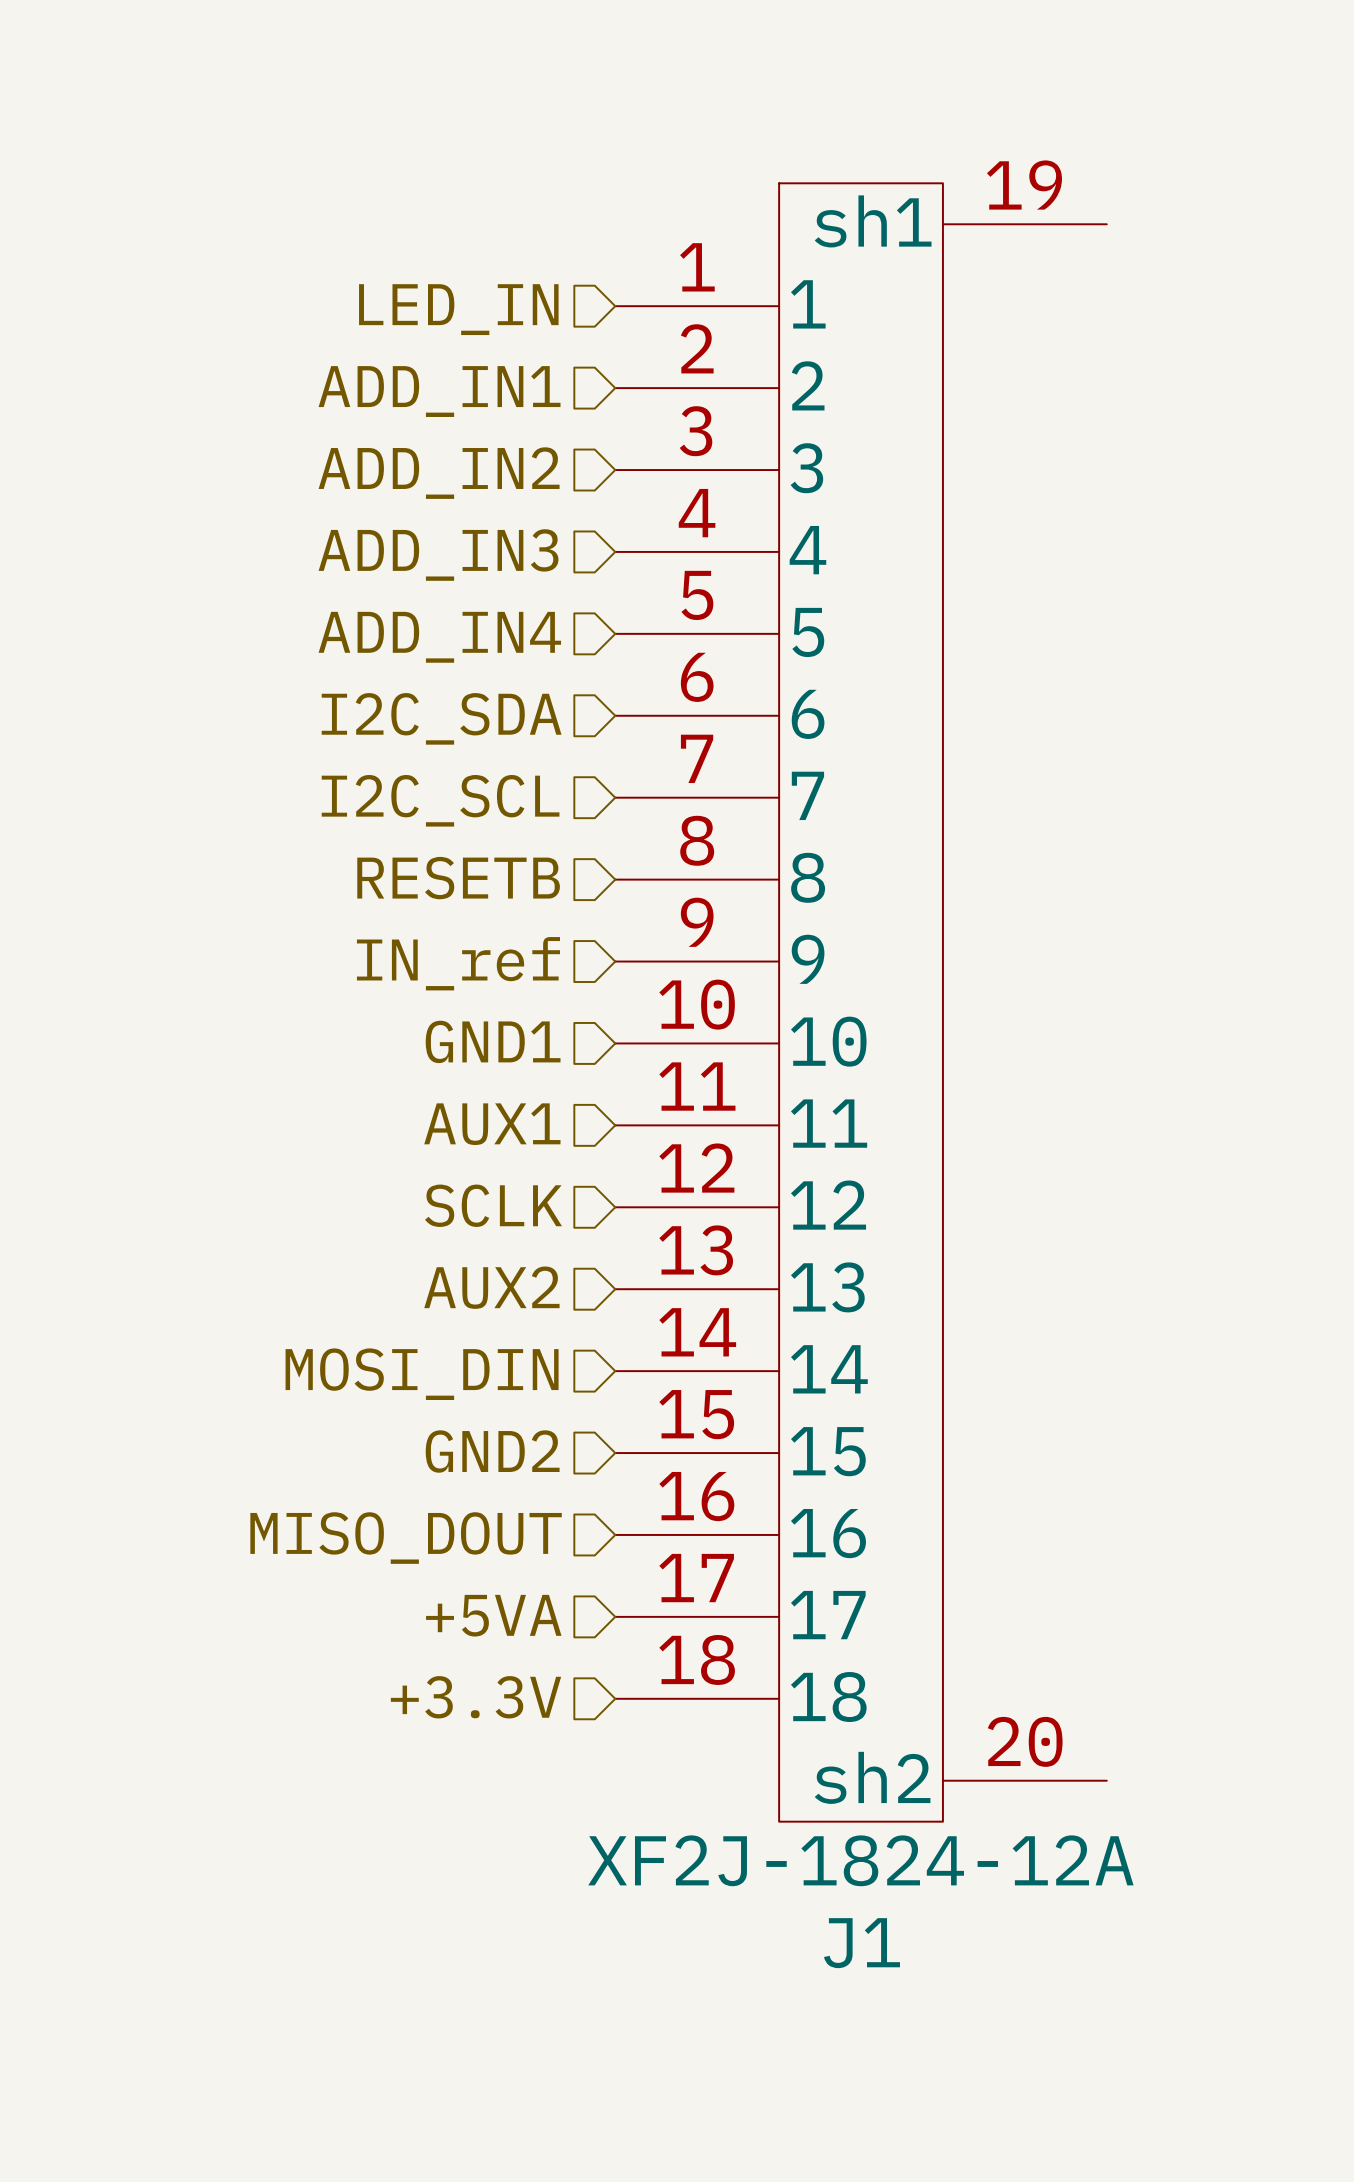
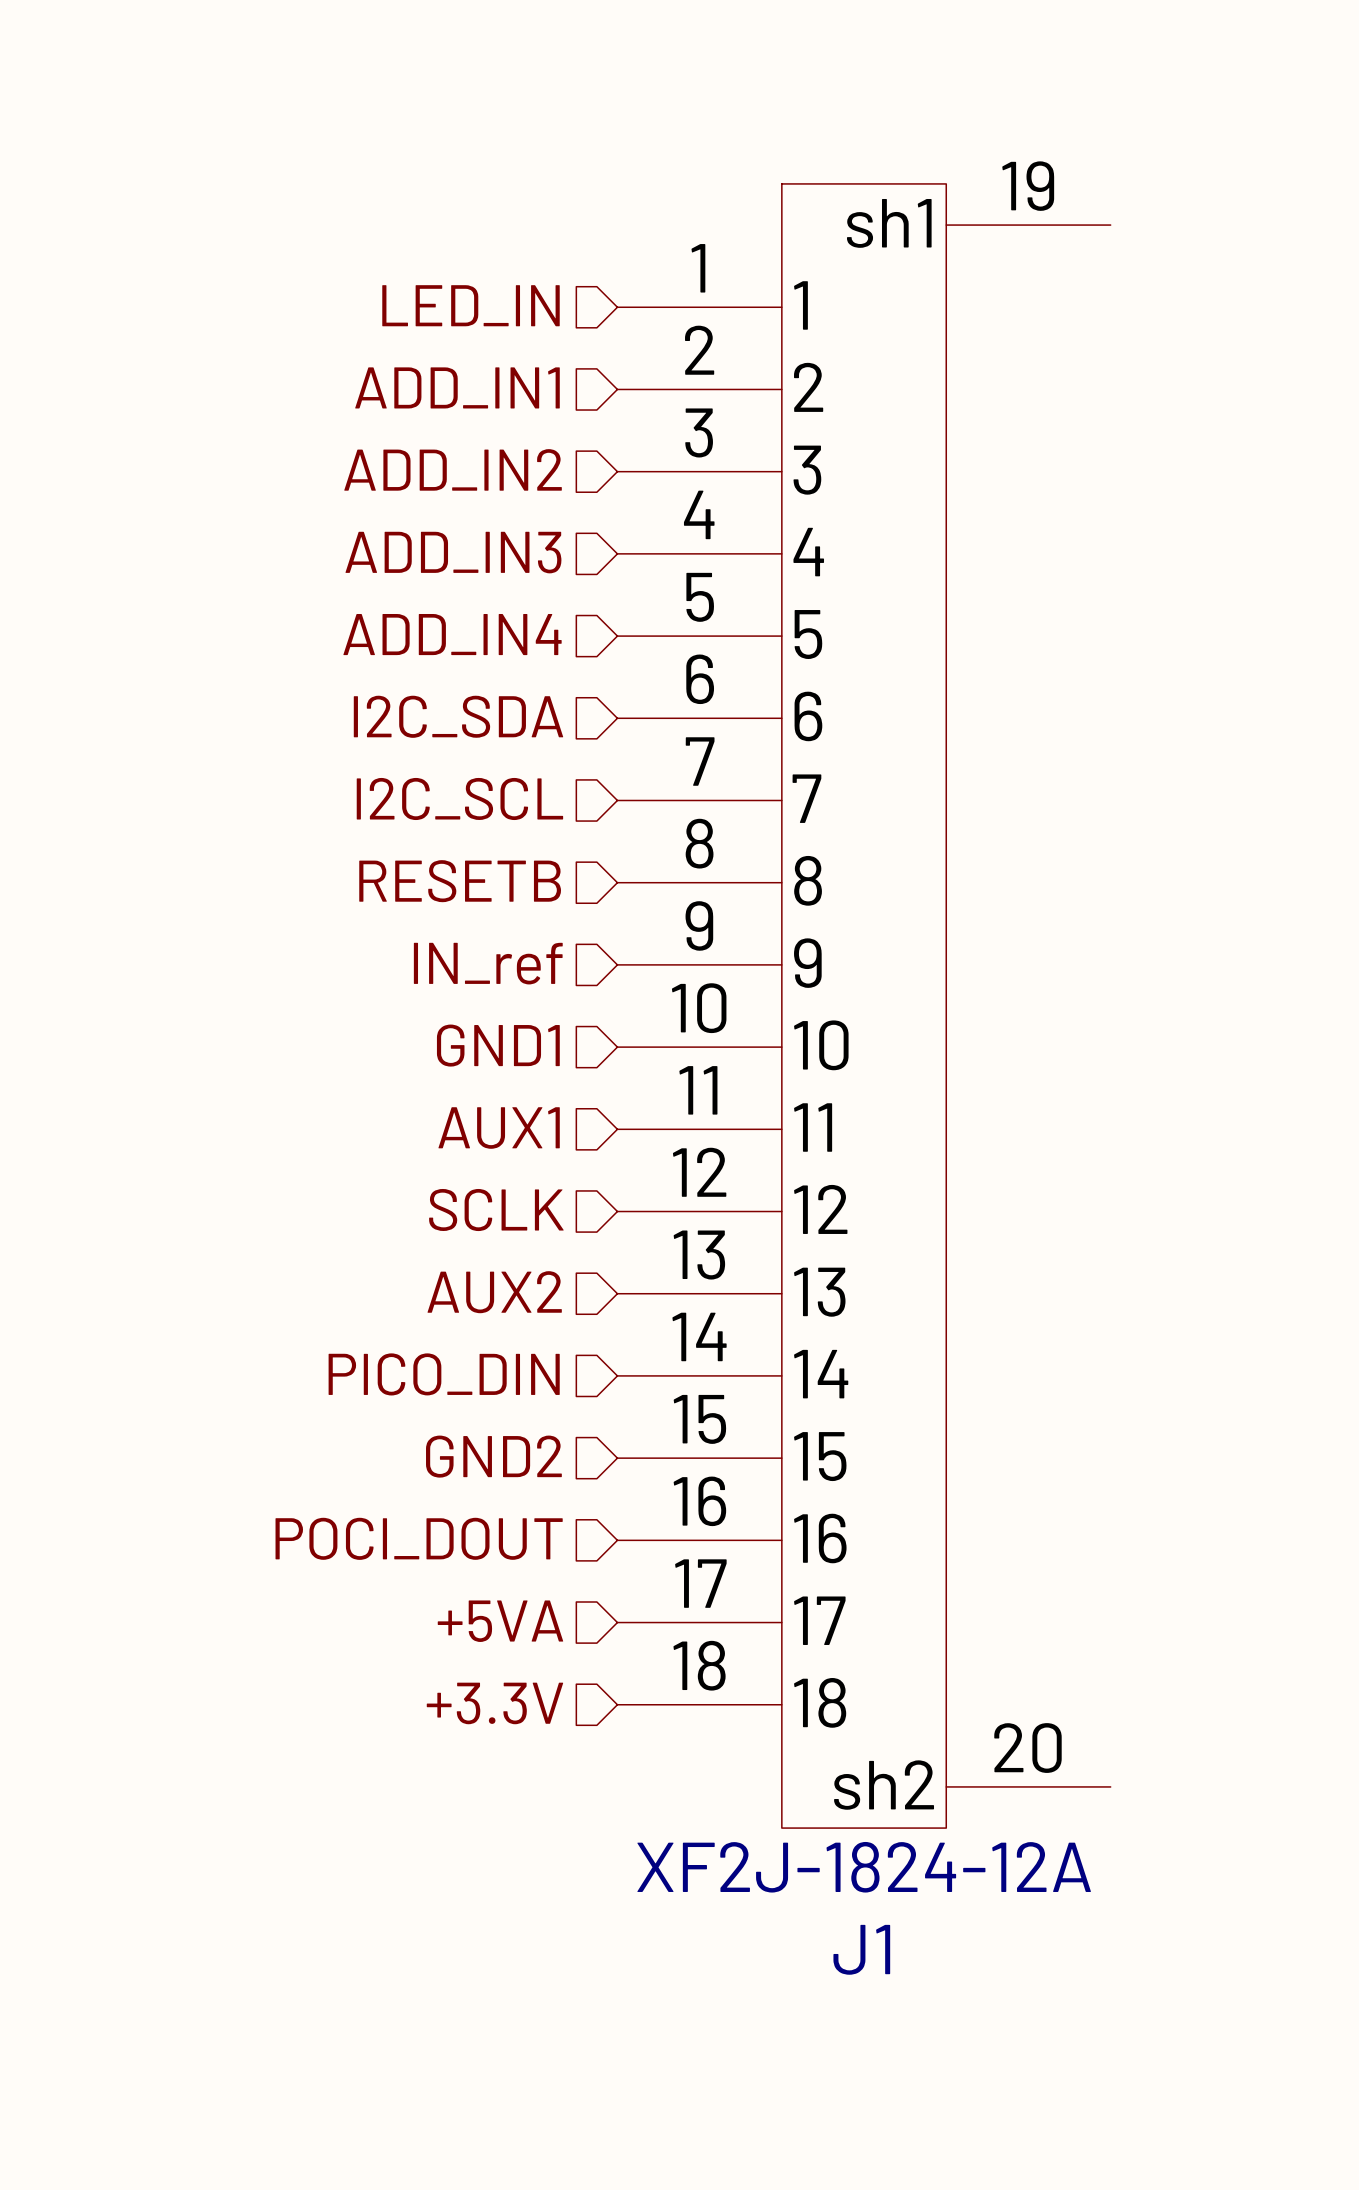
hierarchical label: MOSI_DIN (422, 1374) -> PICO_DIN (444, 1374)
hierarchical label: MISO_DOUT (406, 1538) -> POCI_DOUT (419, 1538)

